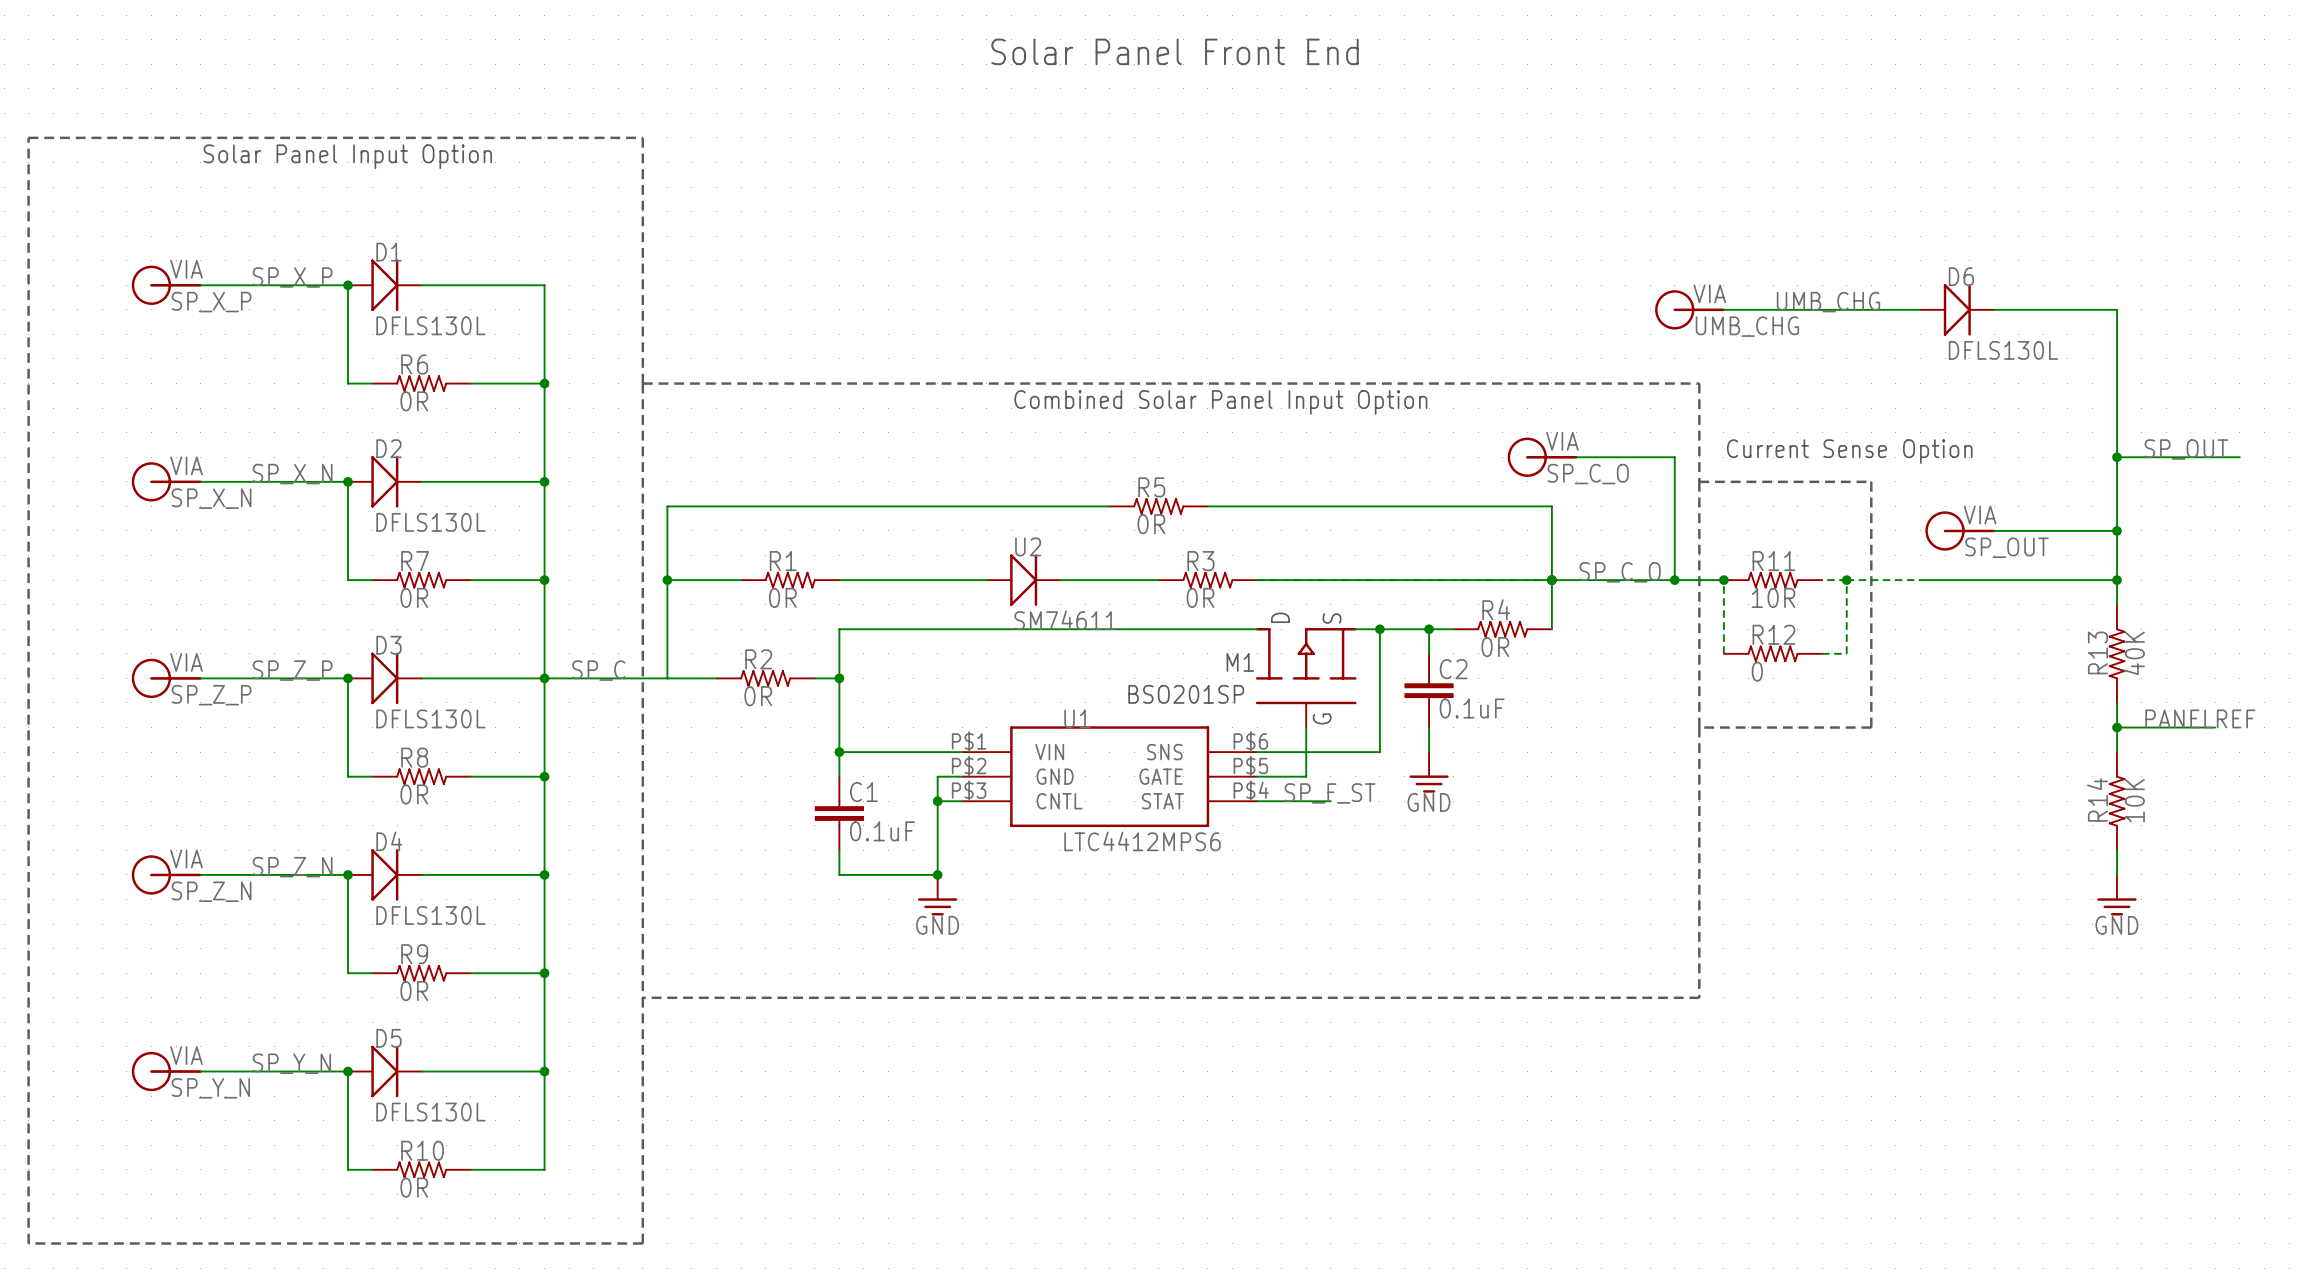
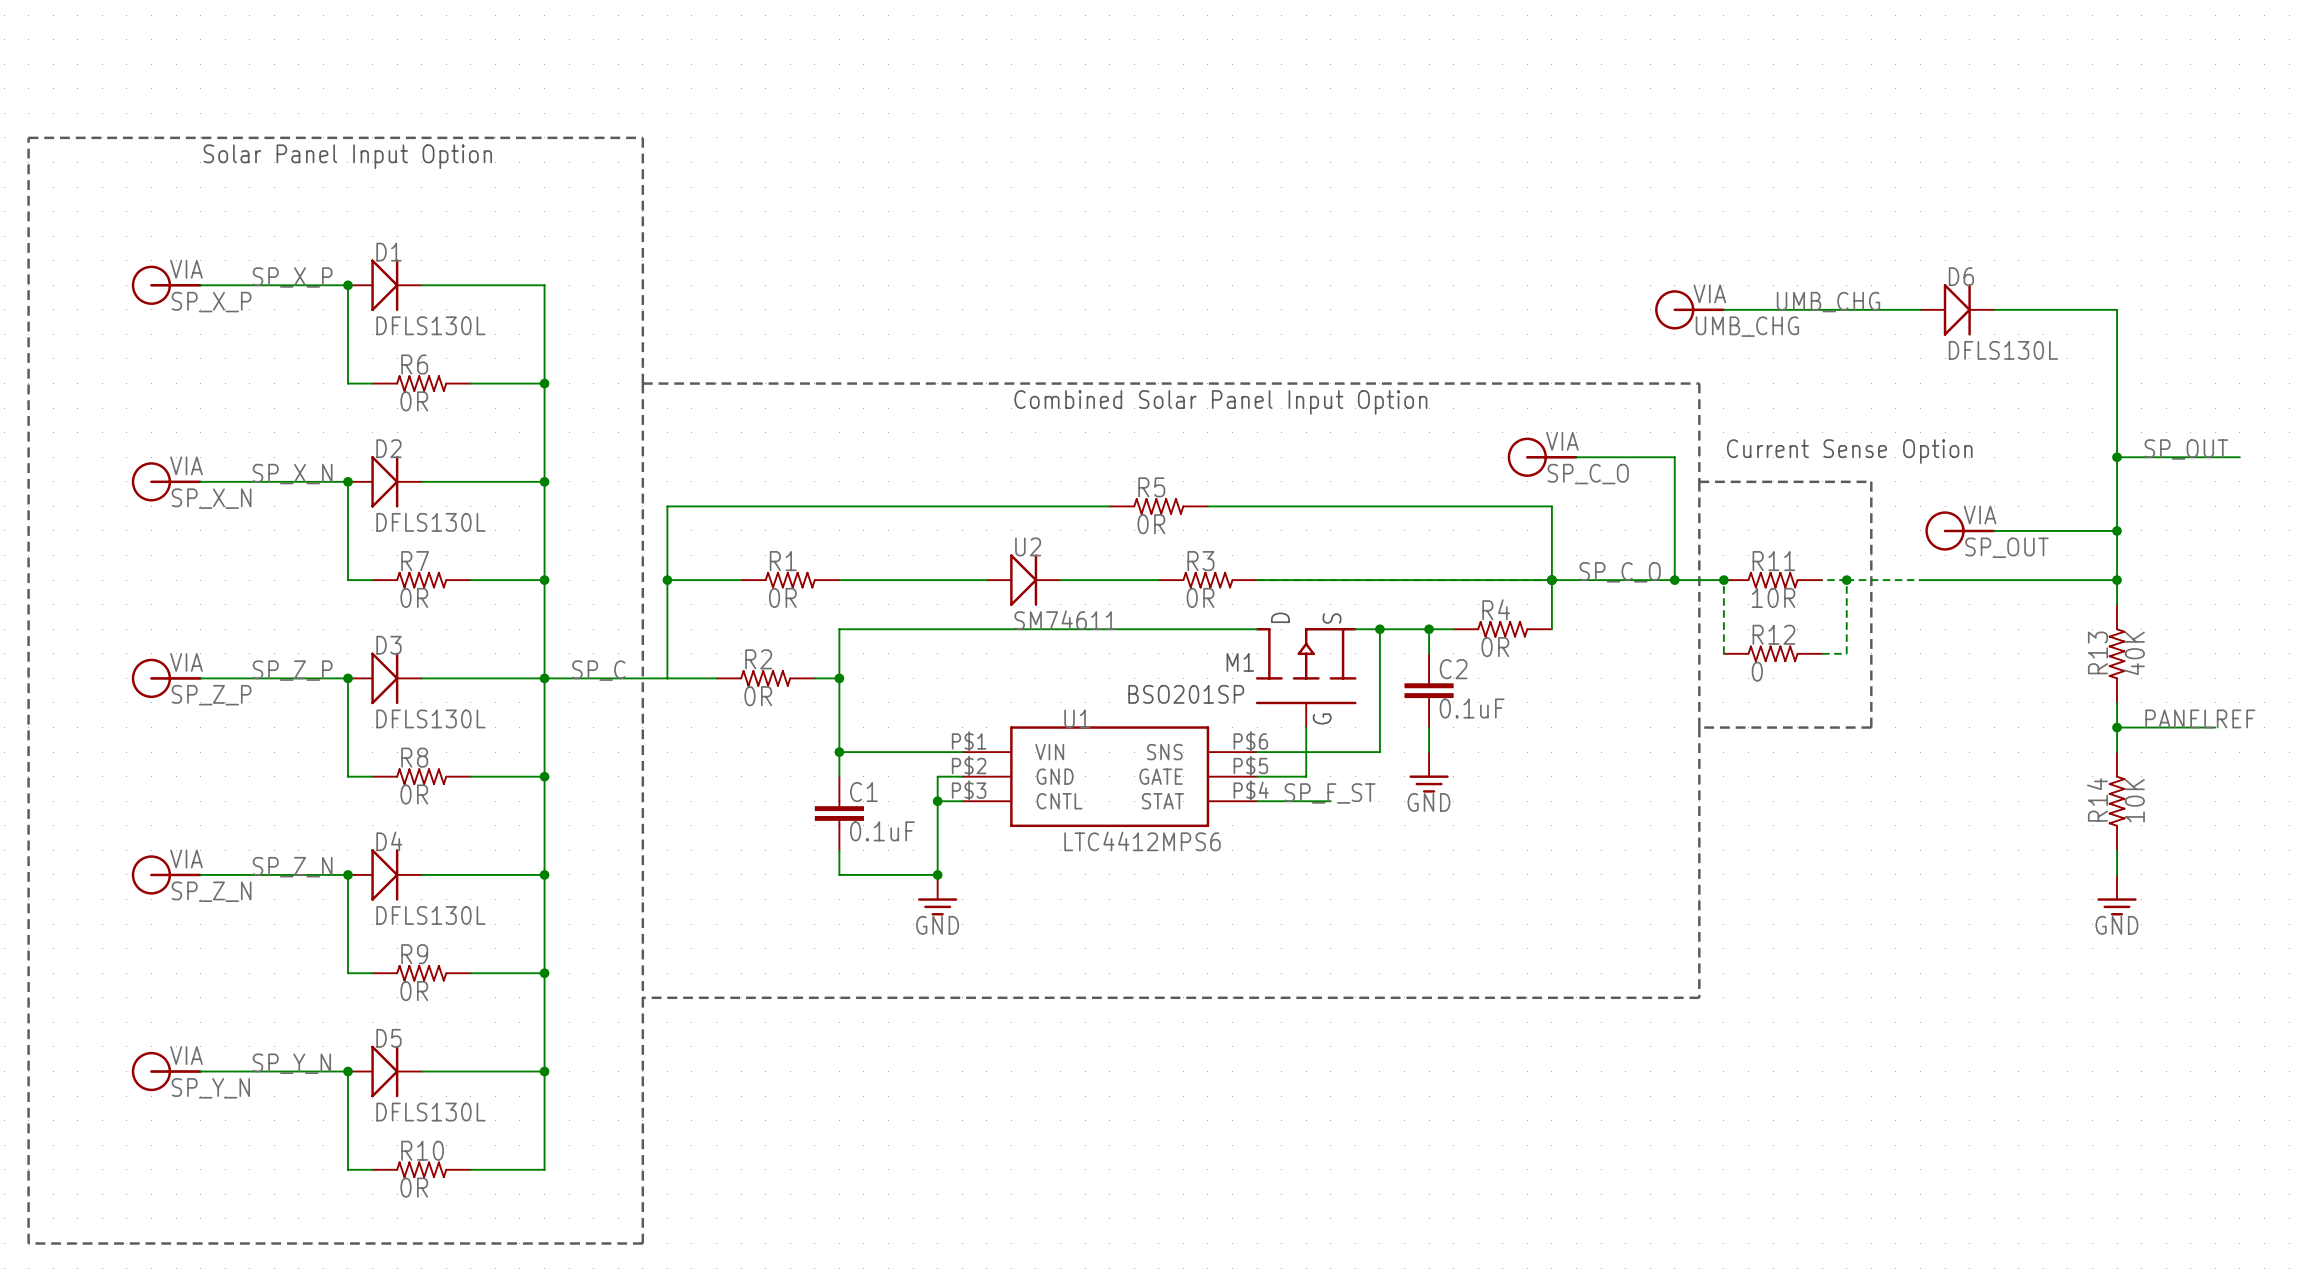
text: Solar Panel Front End (1175, 51) -> none

